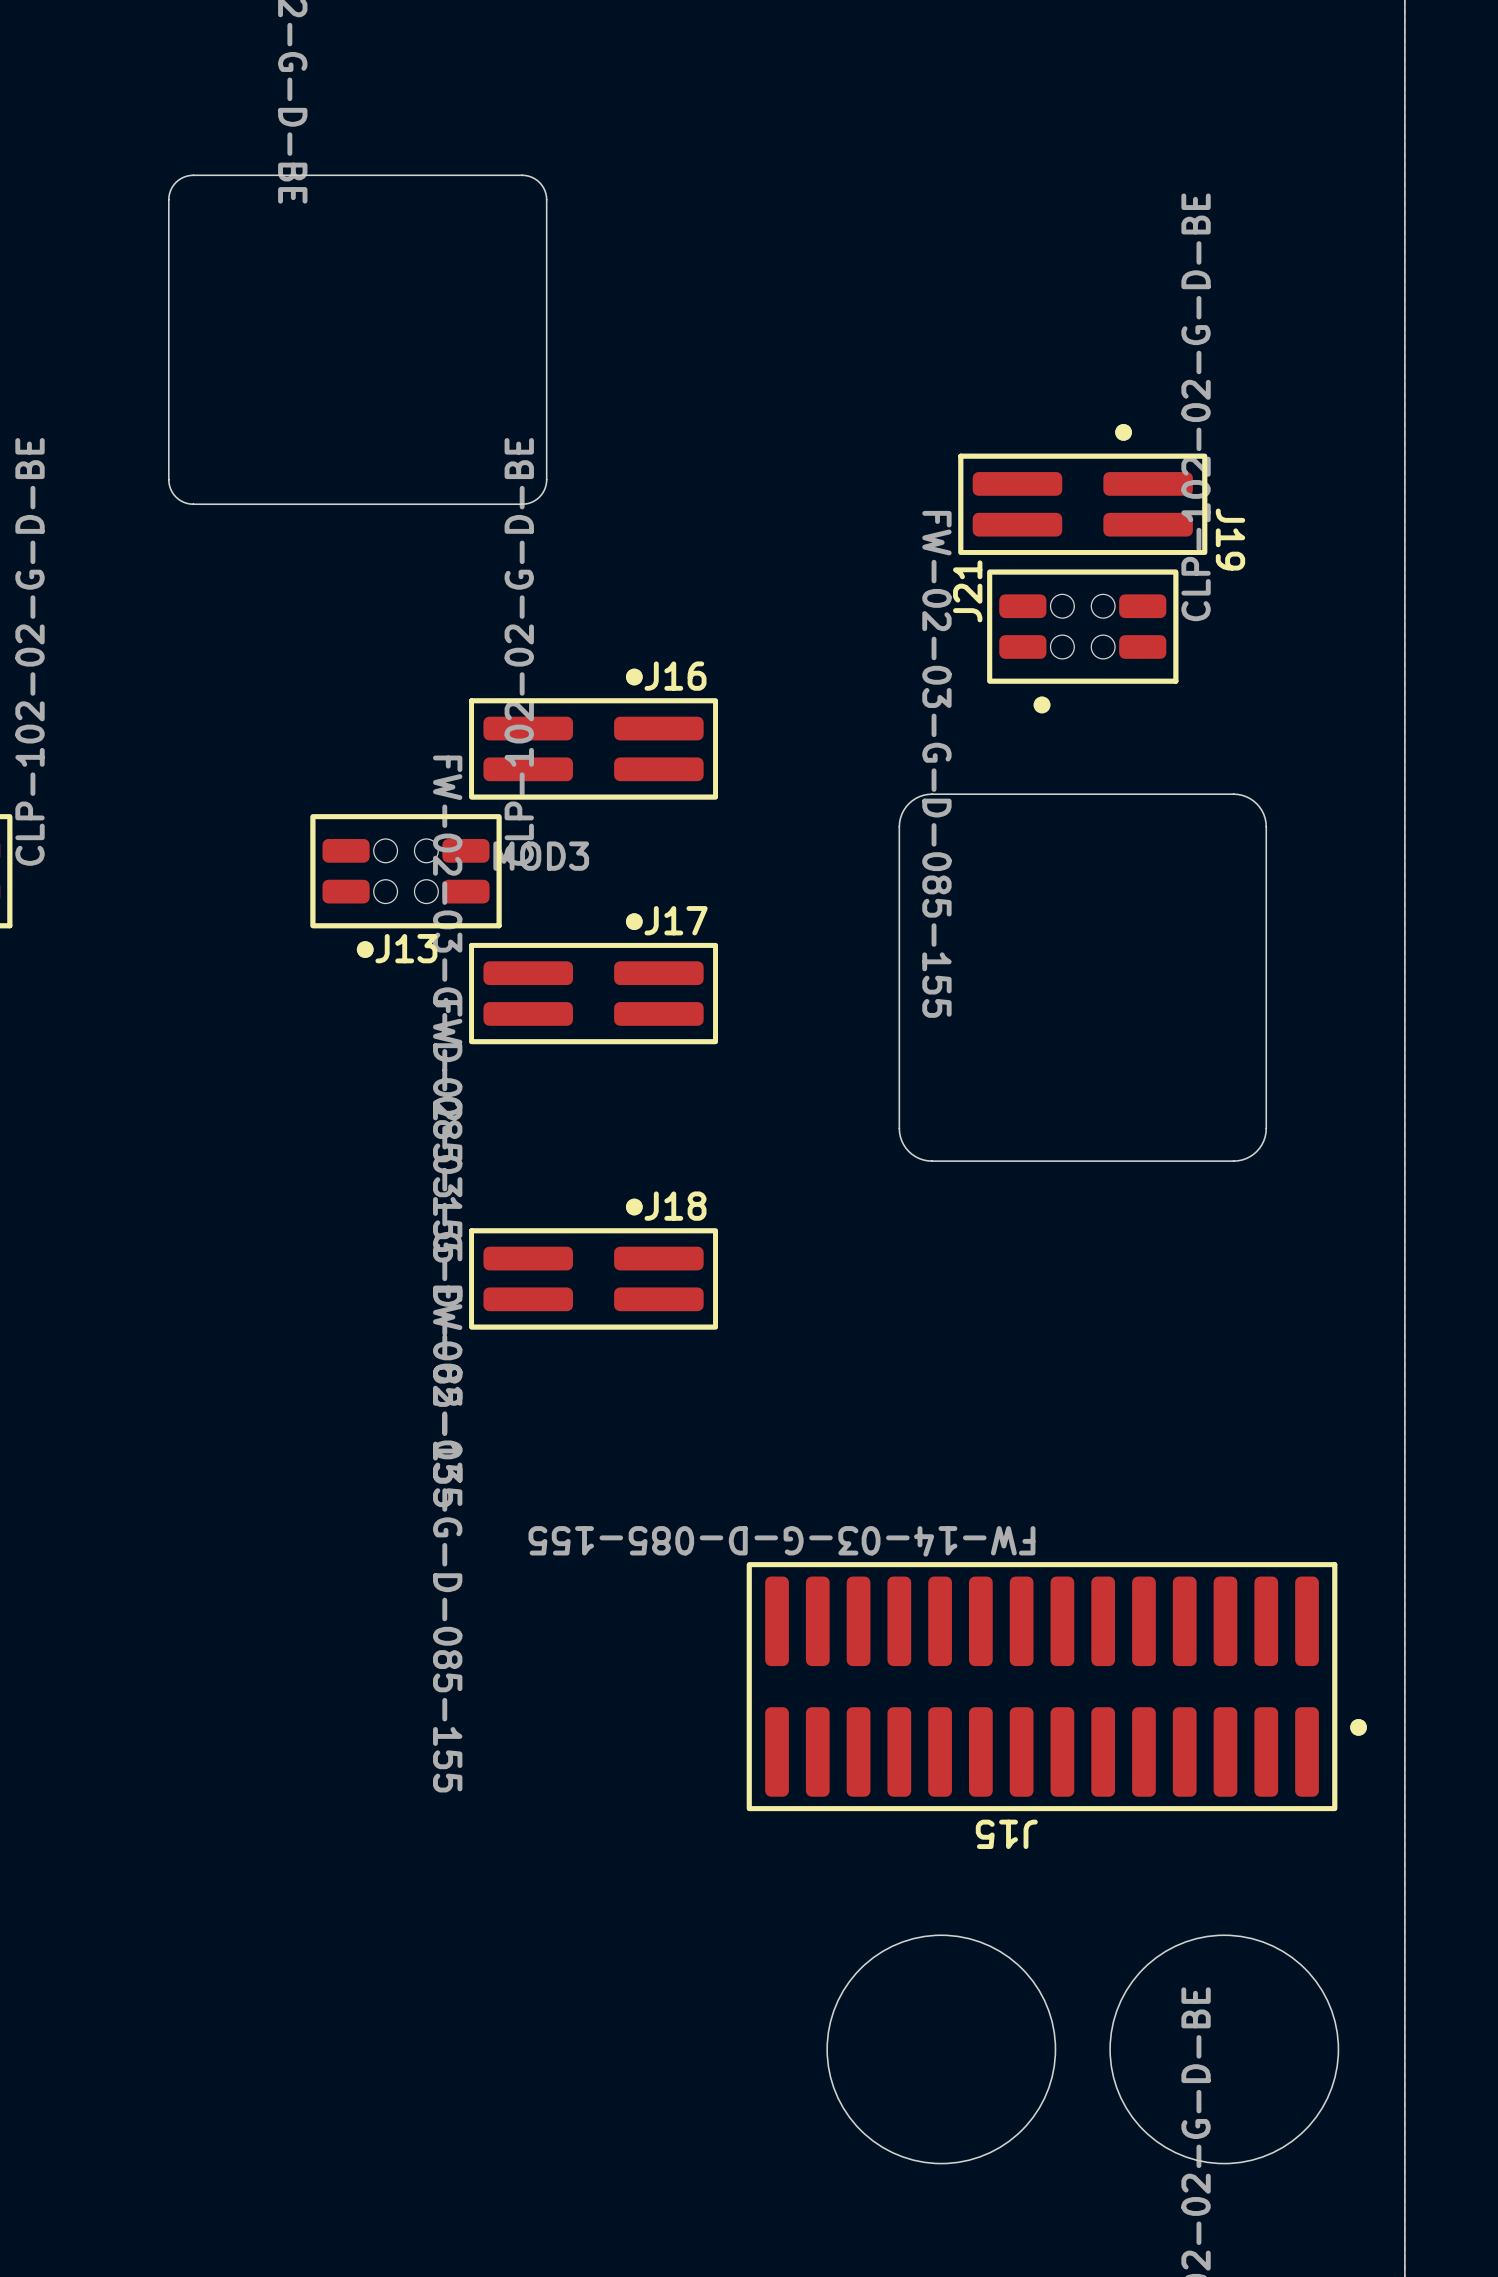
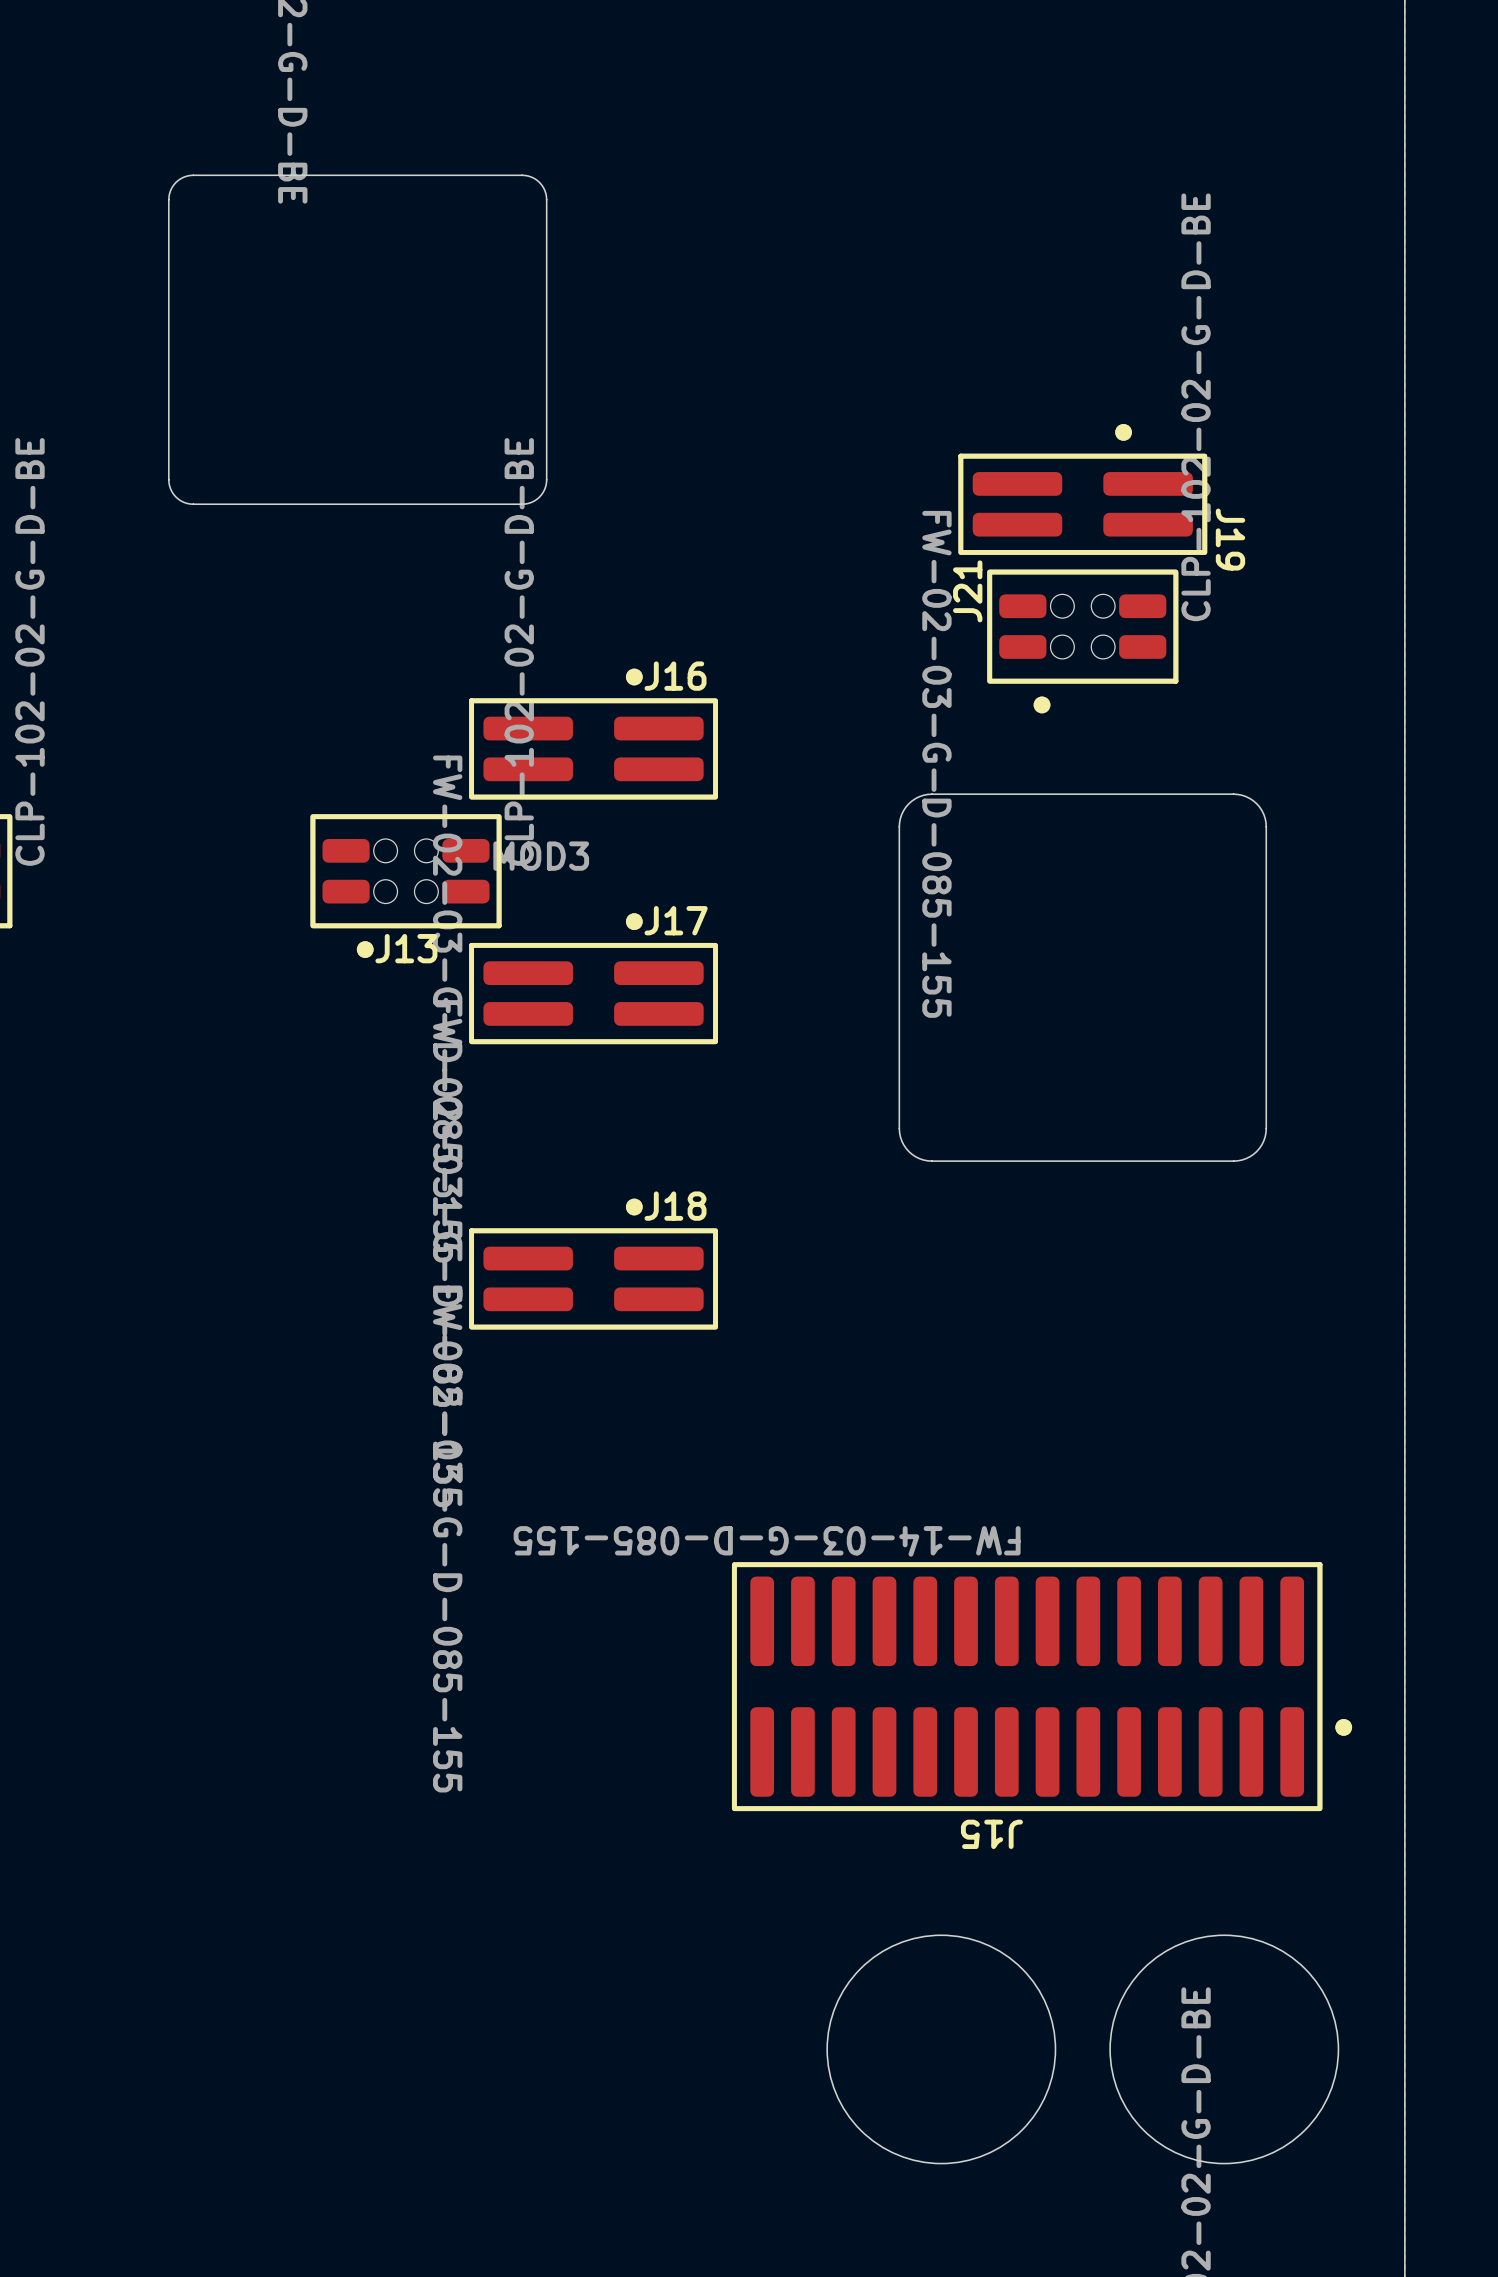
J15 position: (1056, 1686) -> (1042, 1686)

